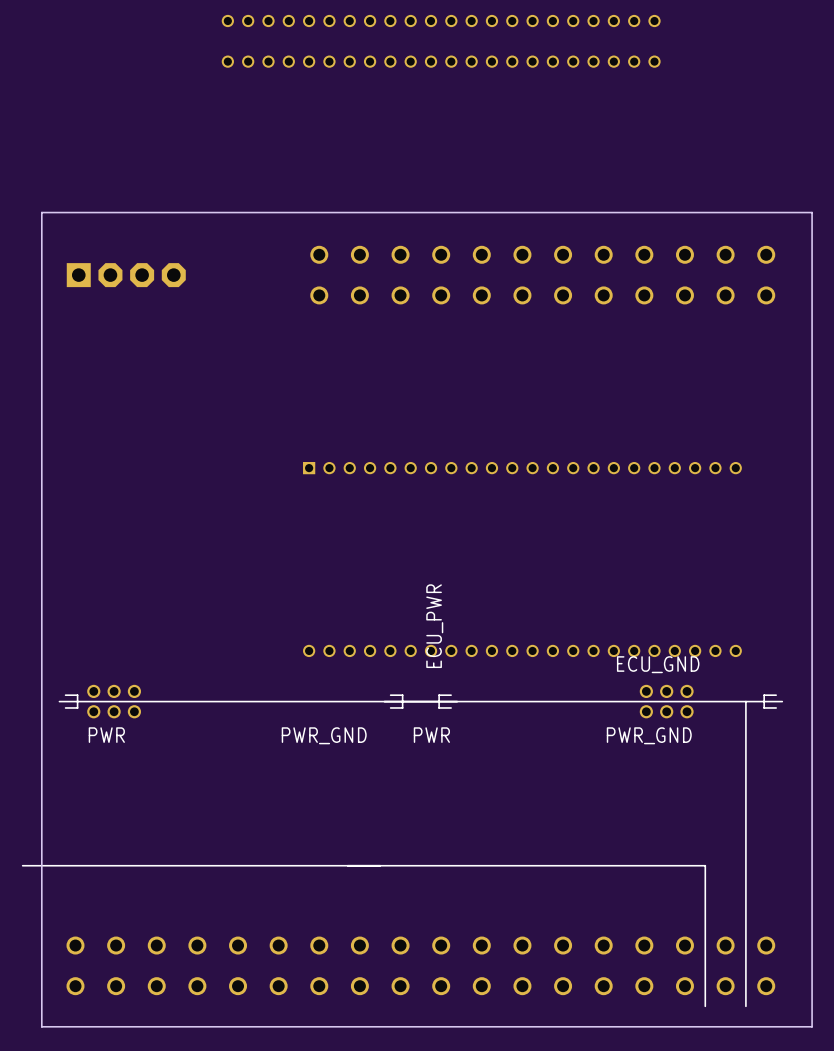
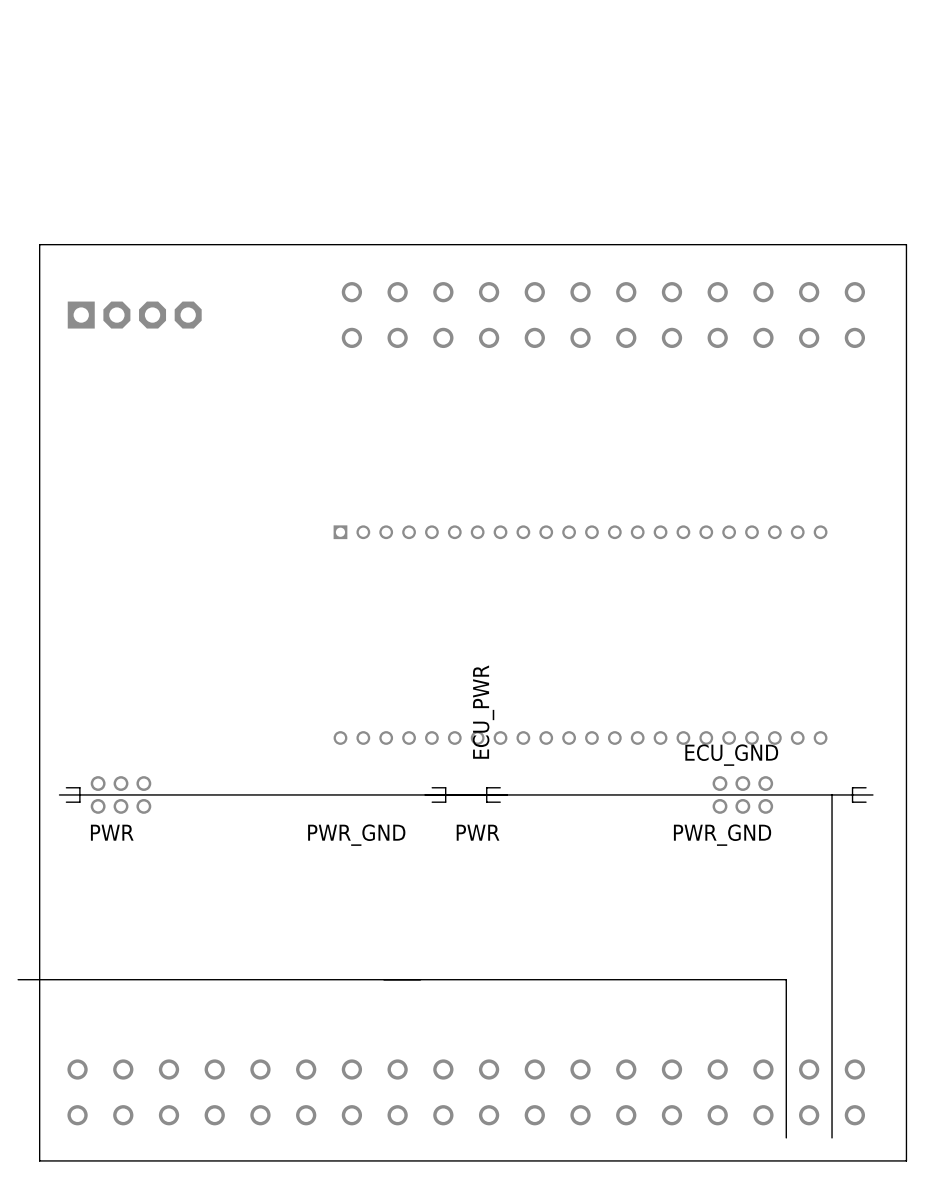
part: (441, 21) -> none
part: (441, 61) -> none

